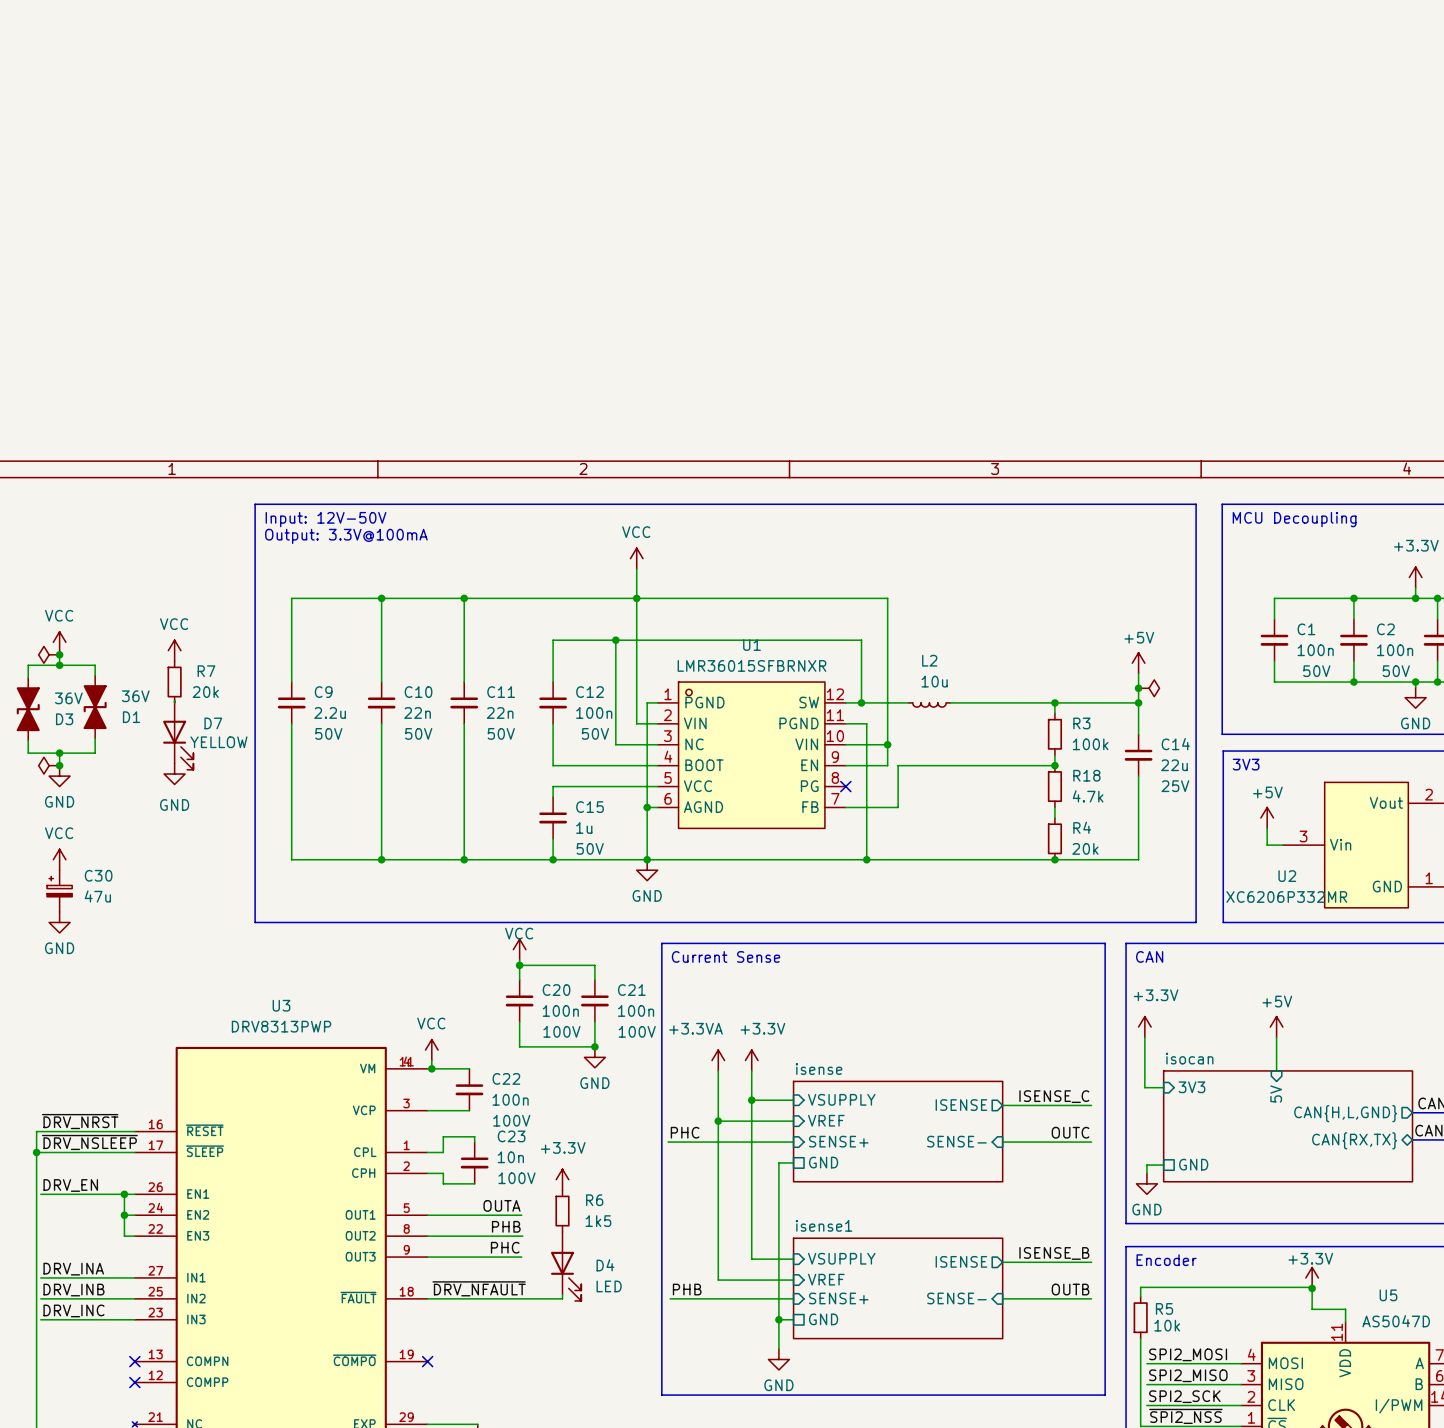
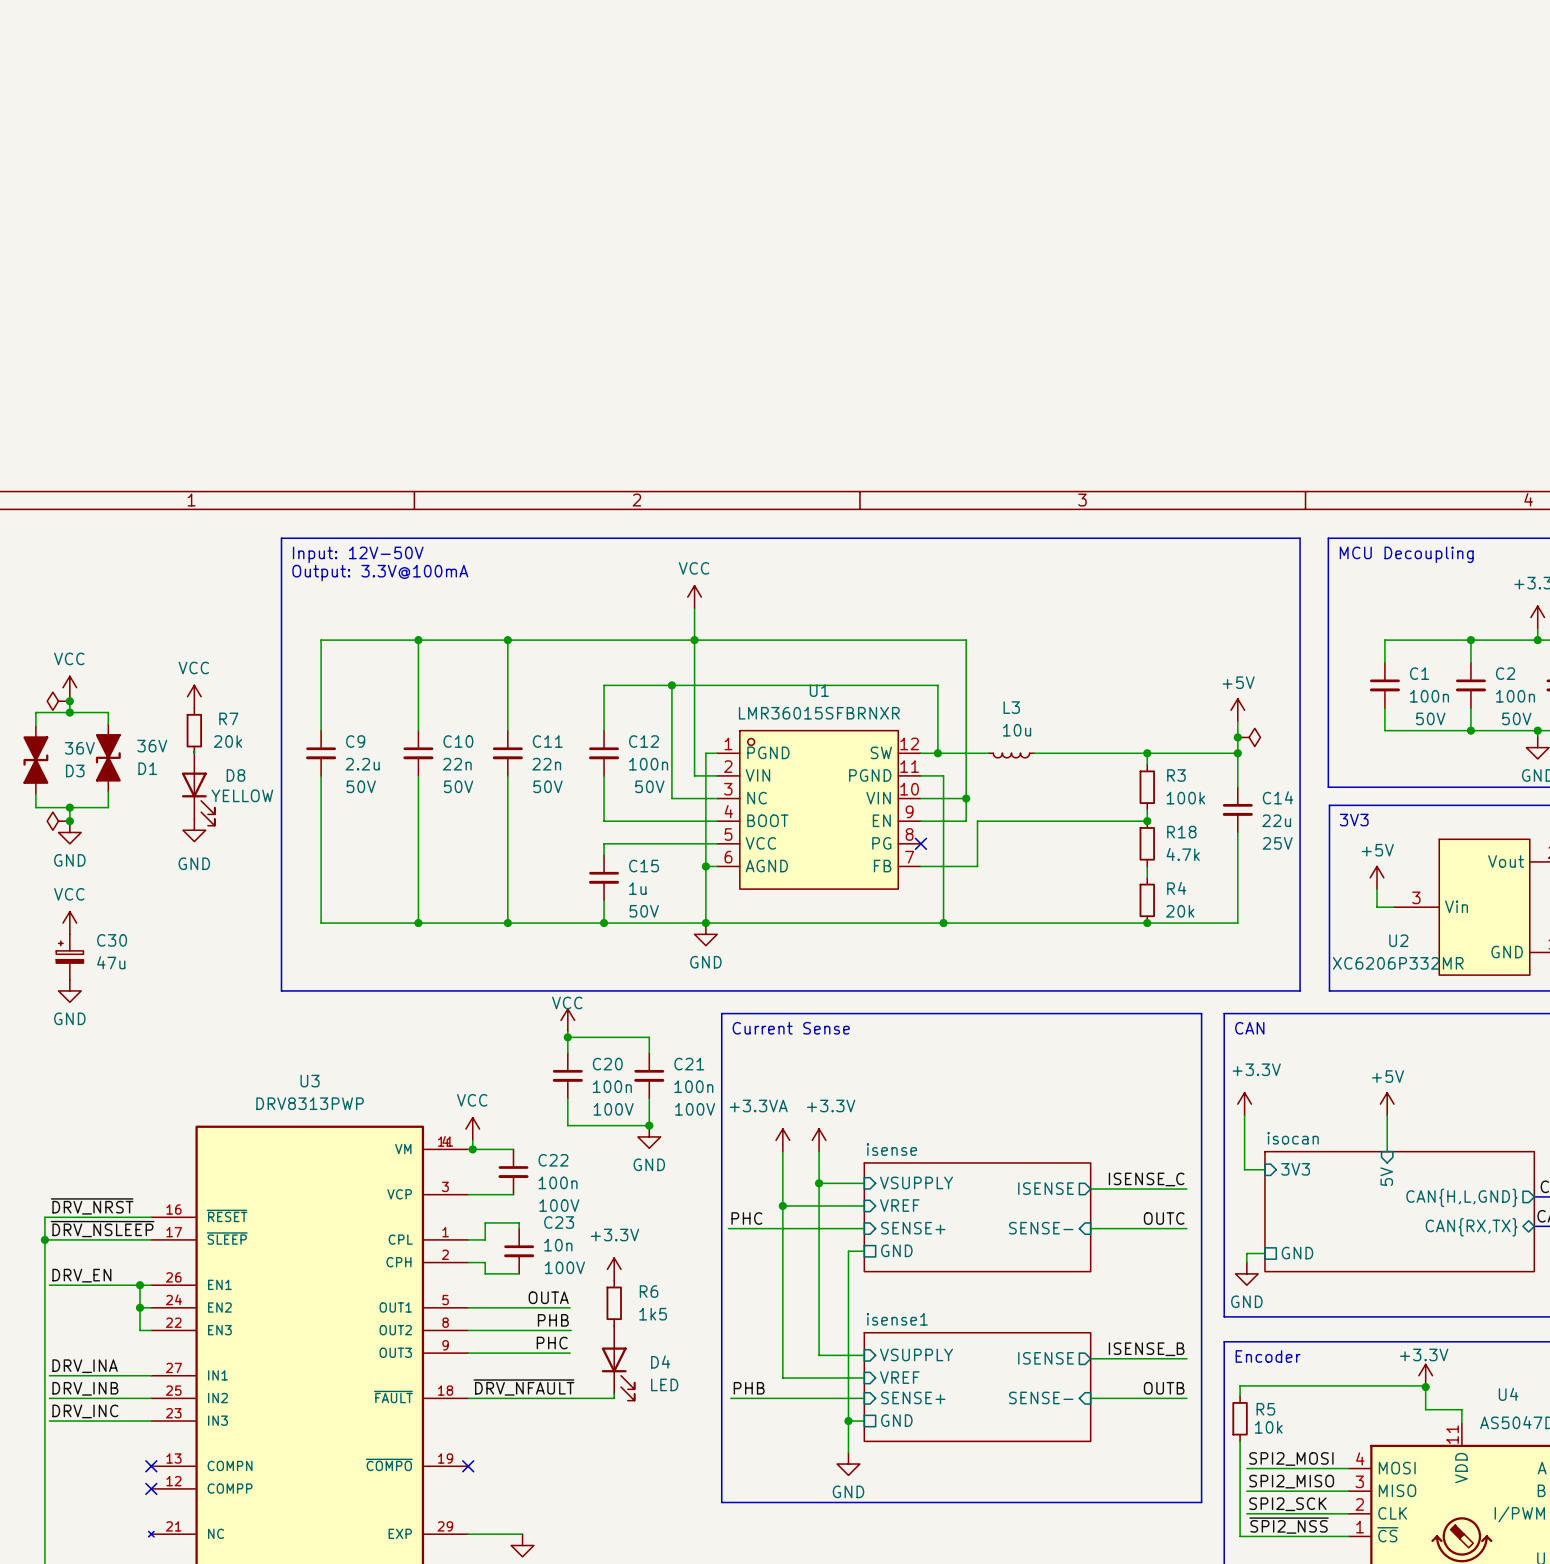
L2 name: L2 (929, 660) -> L3 (1011, 707)
D7 name: D7 (213, 723) -> D8 (235, 775)
U5 name: U5 (1388, 1295) -> U4 (1508, 1394)

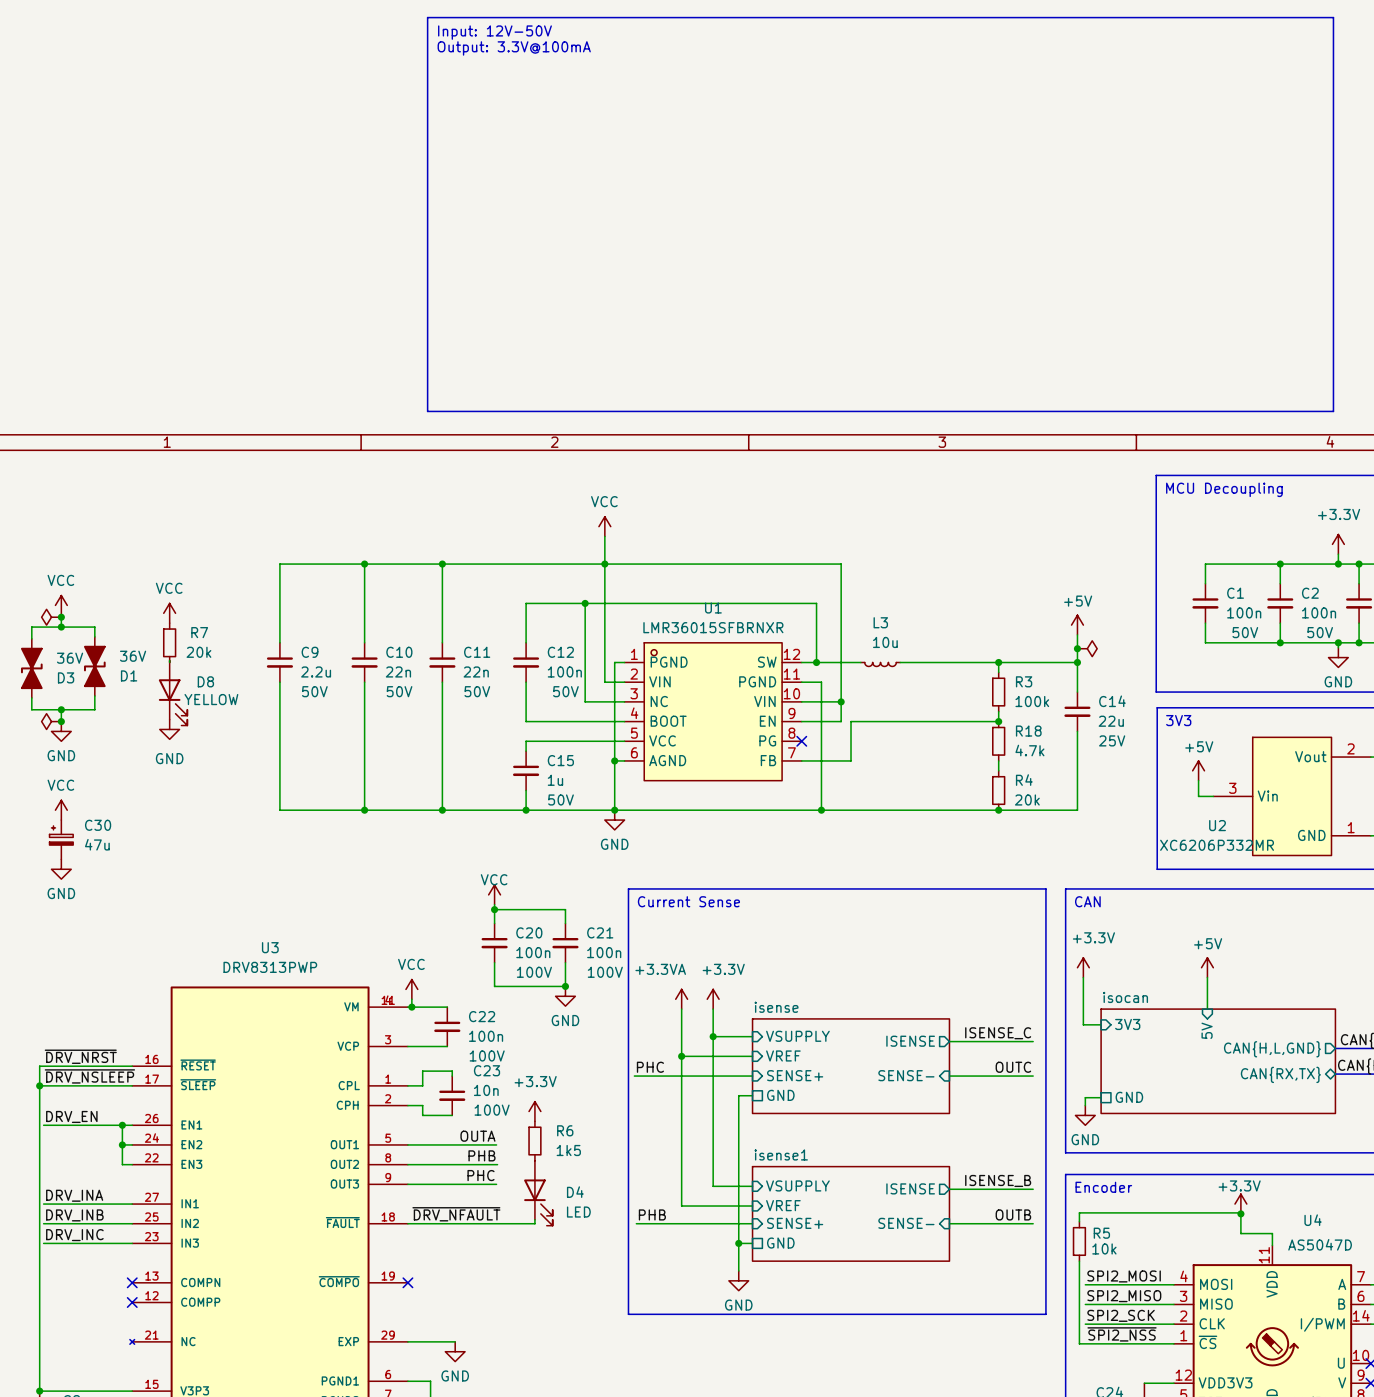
line: none -> (427, 17) (1333, 17) (1333, 411) (427, 411) (427, 17)
text: none -> Input: 12V-50V (494, 32)
text: none -> Output: 3.3V@100mA (514, 48)
line: (281, 538) (1300, 538) (1300, 990) (281, 990) (281, 538) -> none
text: Input: 12V-50V (358, 554) -> none
text: Output: 3.3V@100mA (380, 573) -> none

